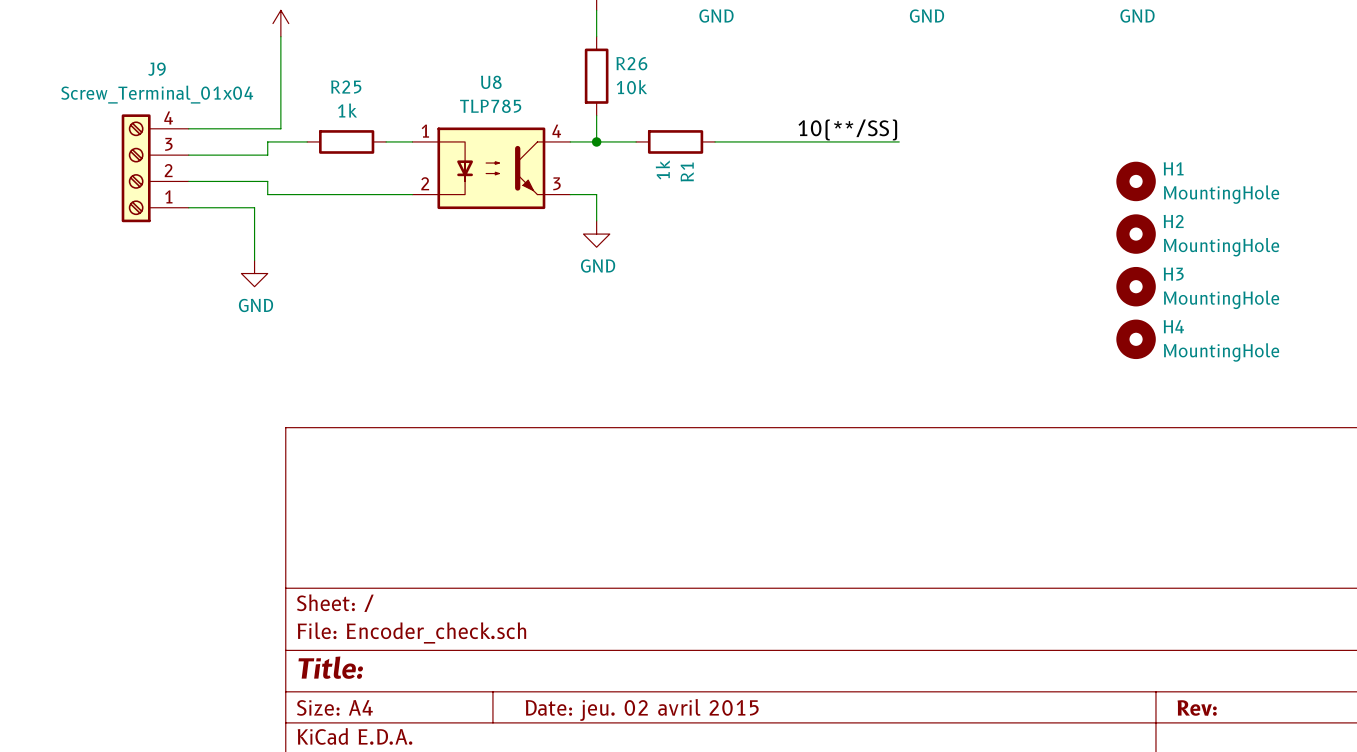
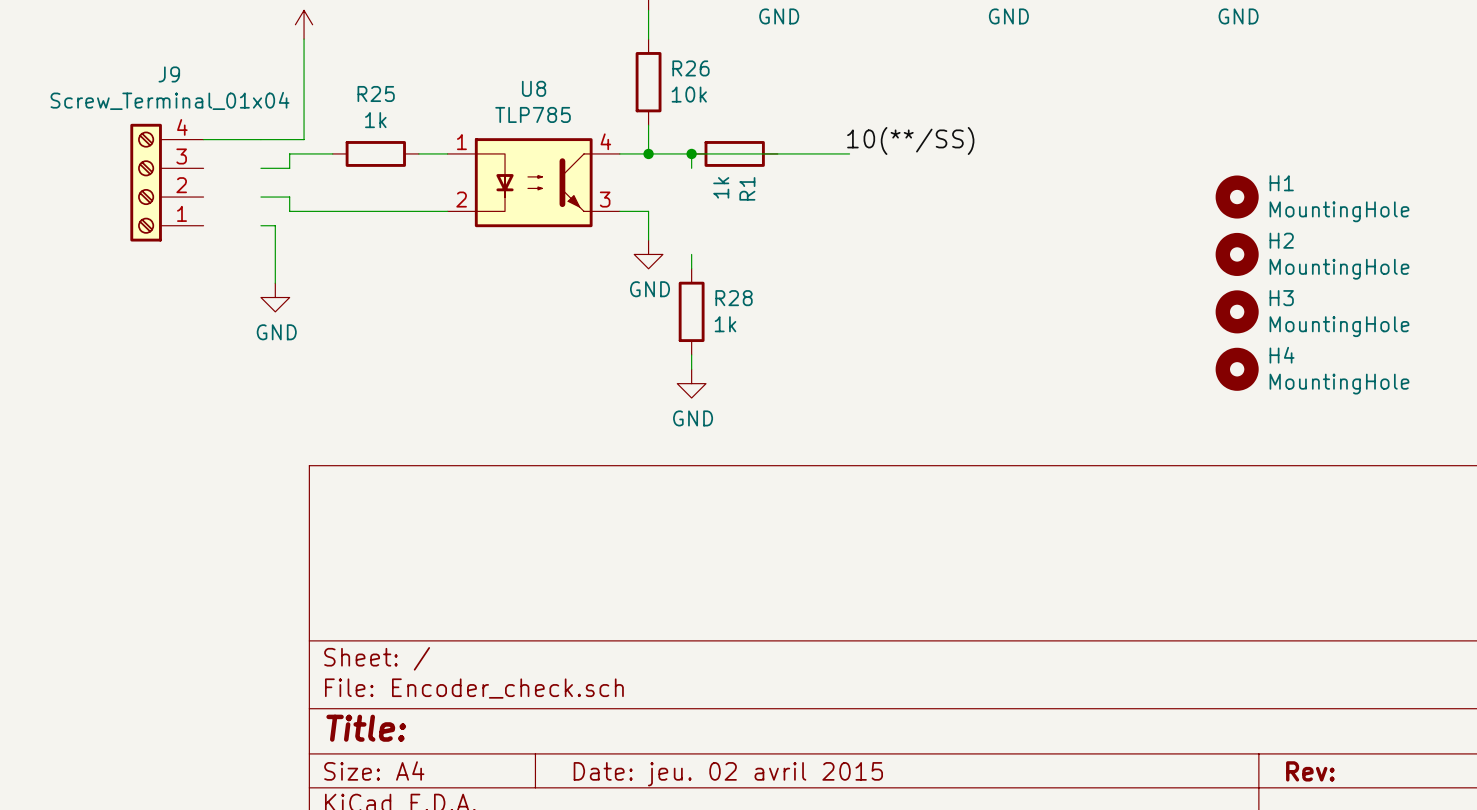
junction: none -> (691, 153)
wire: none -> (777, 153) (691, 153) (691, 168)
wire: (780, 141) (899, 141) -> none
wire: (188, 155) (241, 155) -> none
wire: (188, 181) (241, 181) -> none
wire: (188, 207) (241, 207) -> none
wire: none -> (691, 254) (691, 268)
R28: none -> 1k (691, 311)
wire: none -> (691, 354) (691, 369)
power symbol: none -> GND (691, 383)

